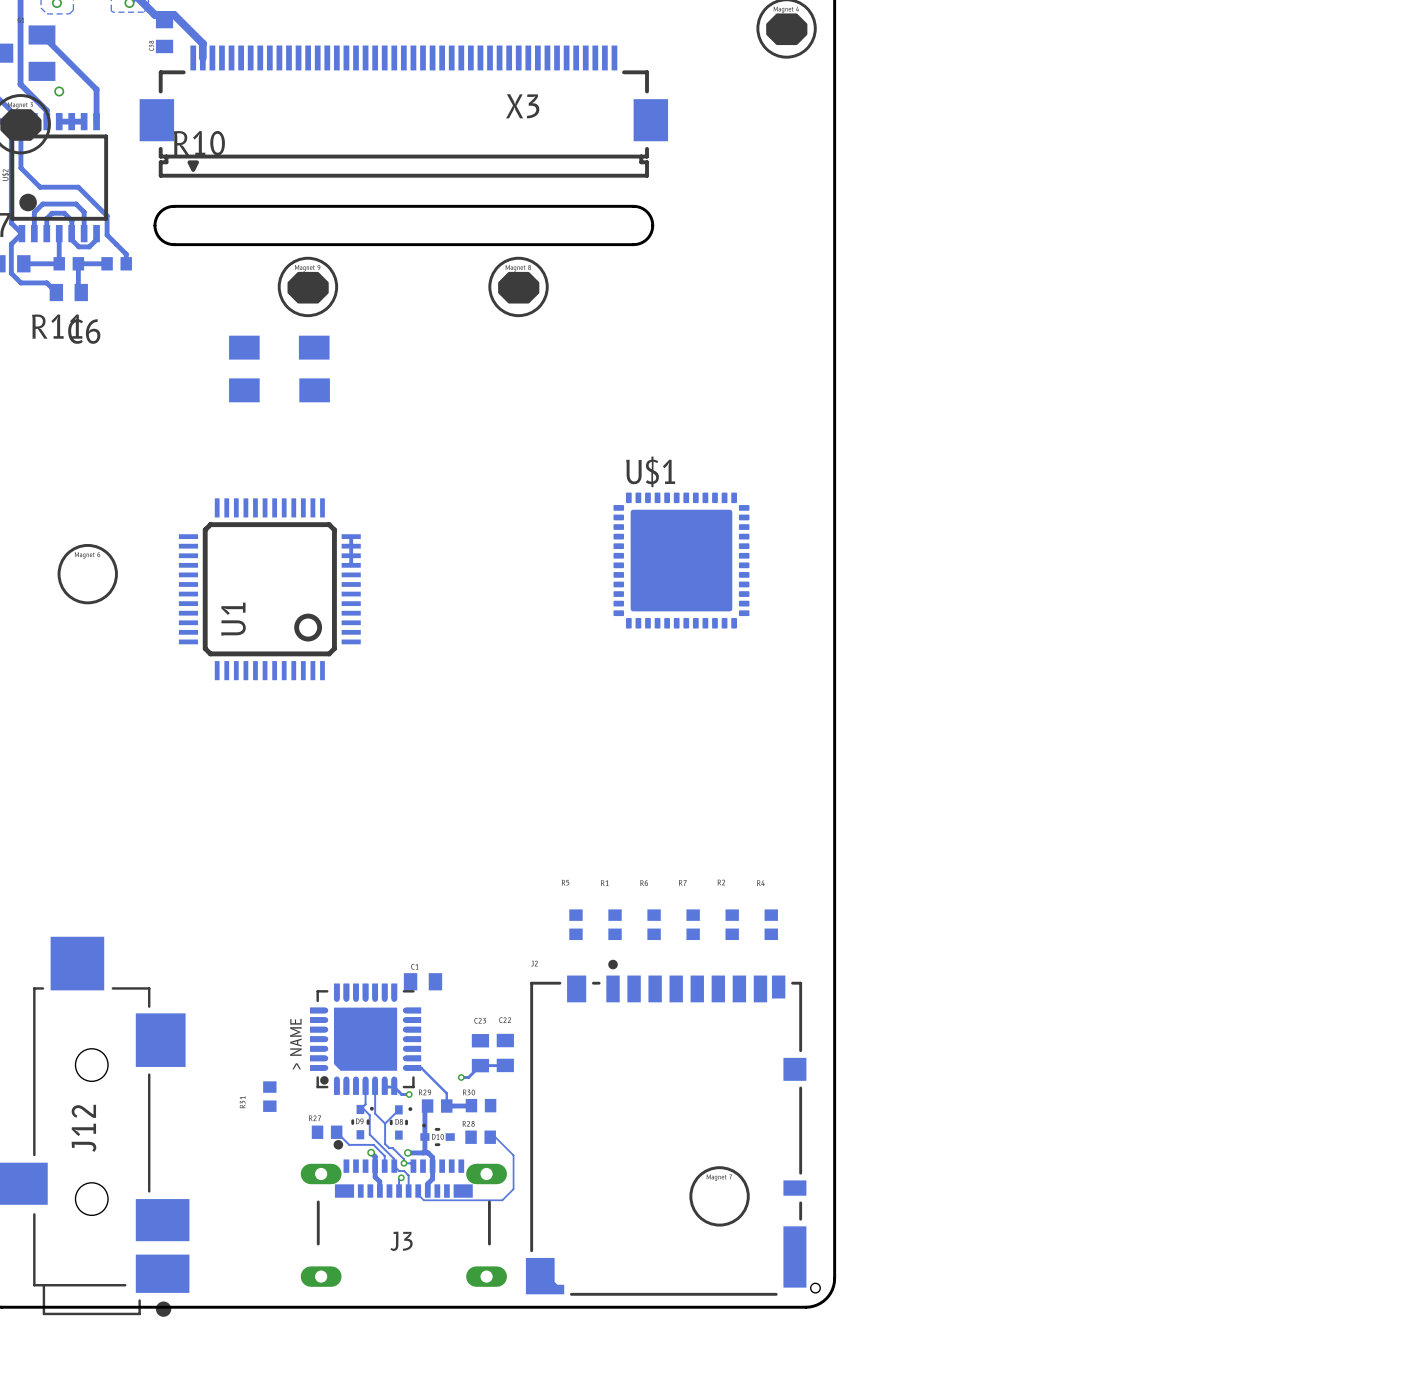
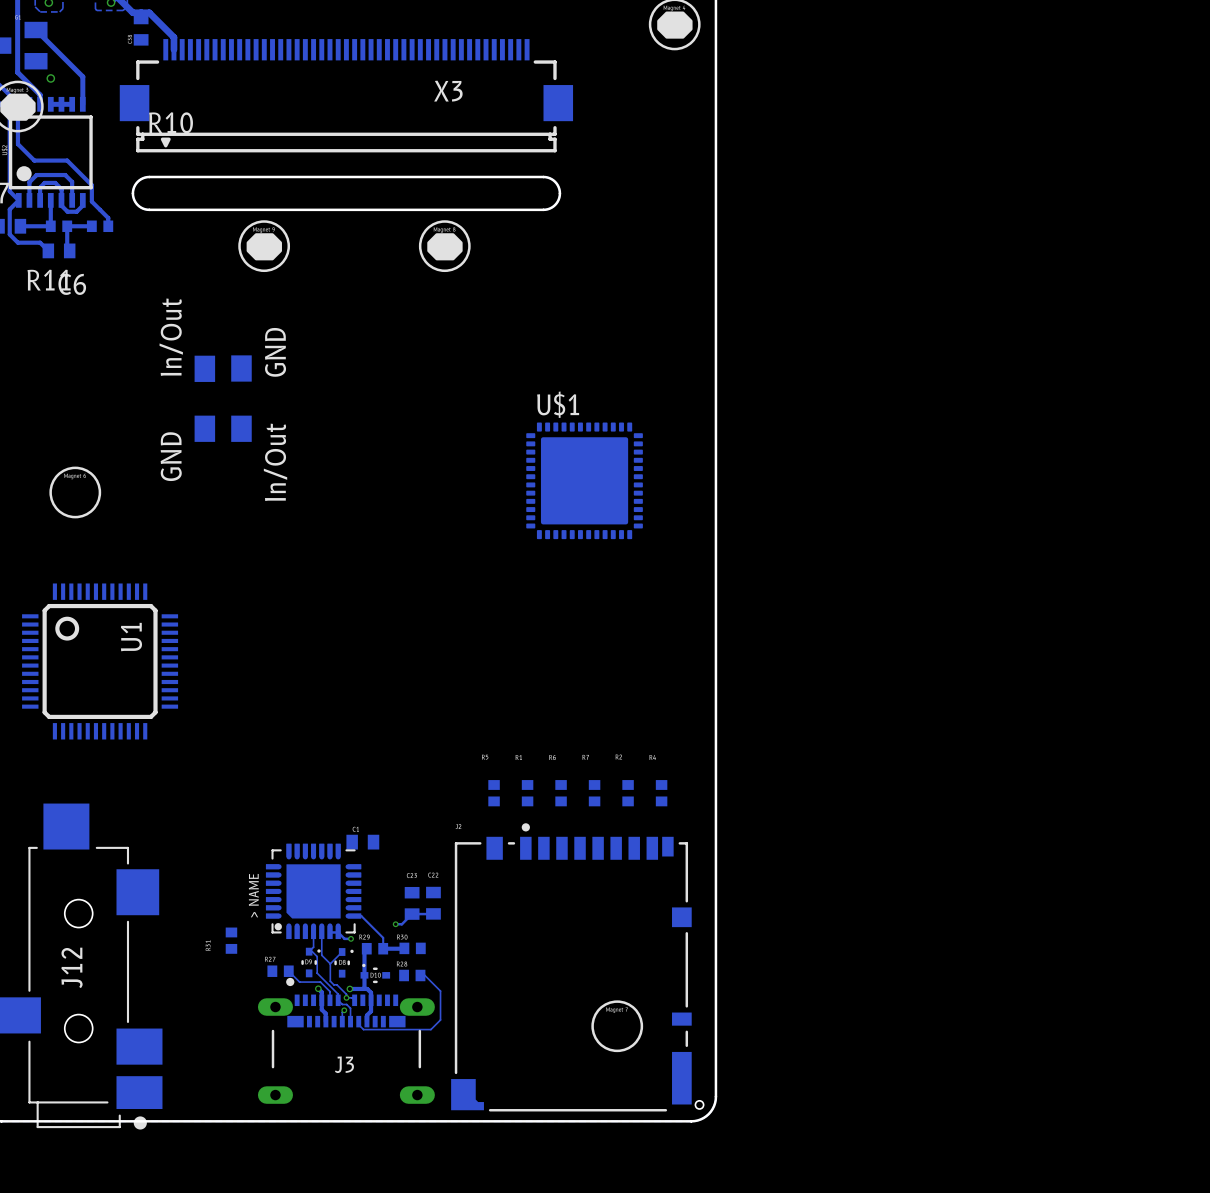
part: (279, 368) -> none
part: none -> (223, 398)
track: (351, 536) (351, 565) -> none
U1 rotation: 0° (269, 589) -> 180° (100, 661)
U1 position: (269, 589) -> (100, 661)

